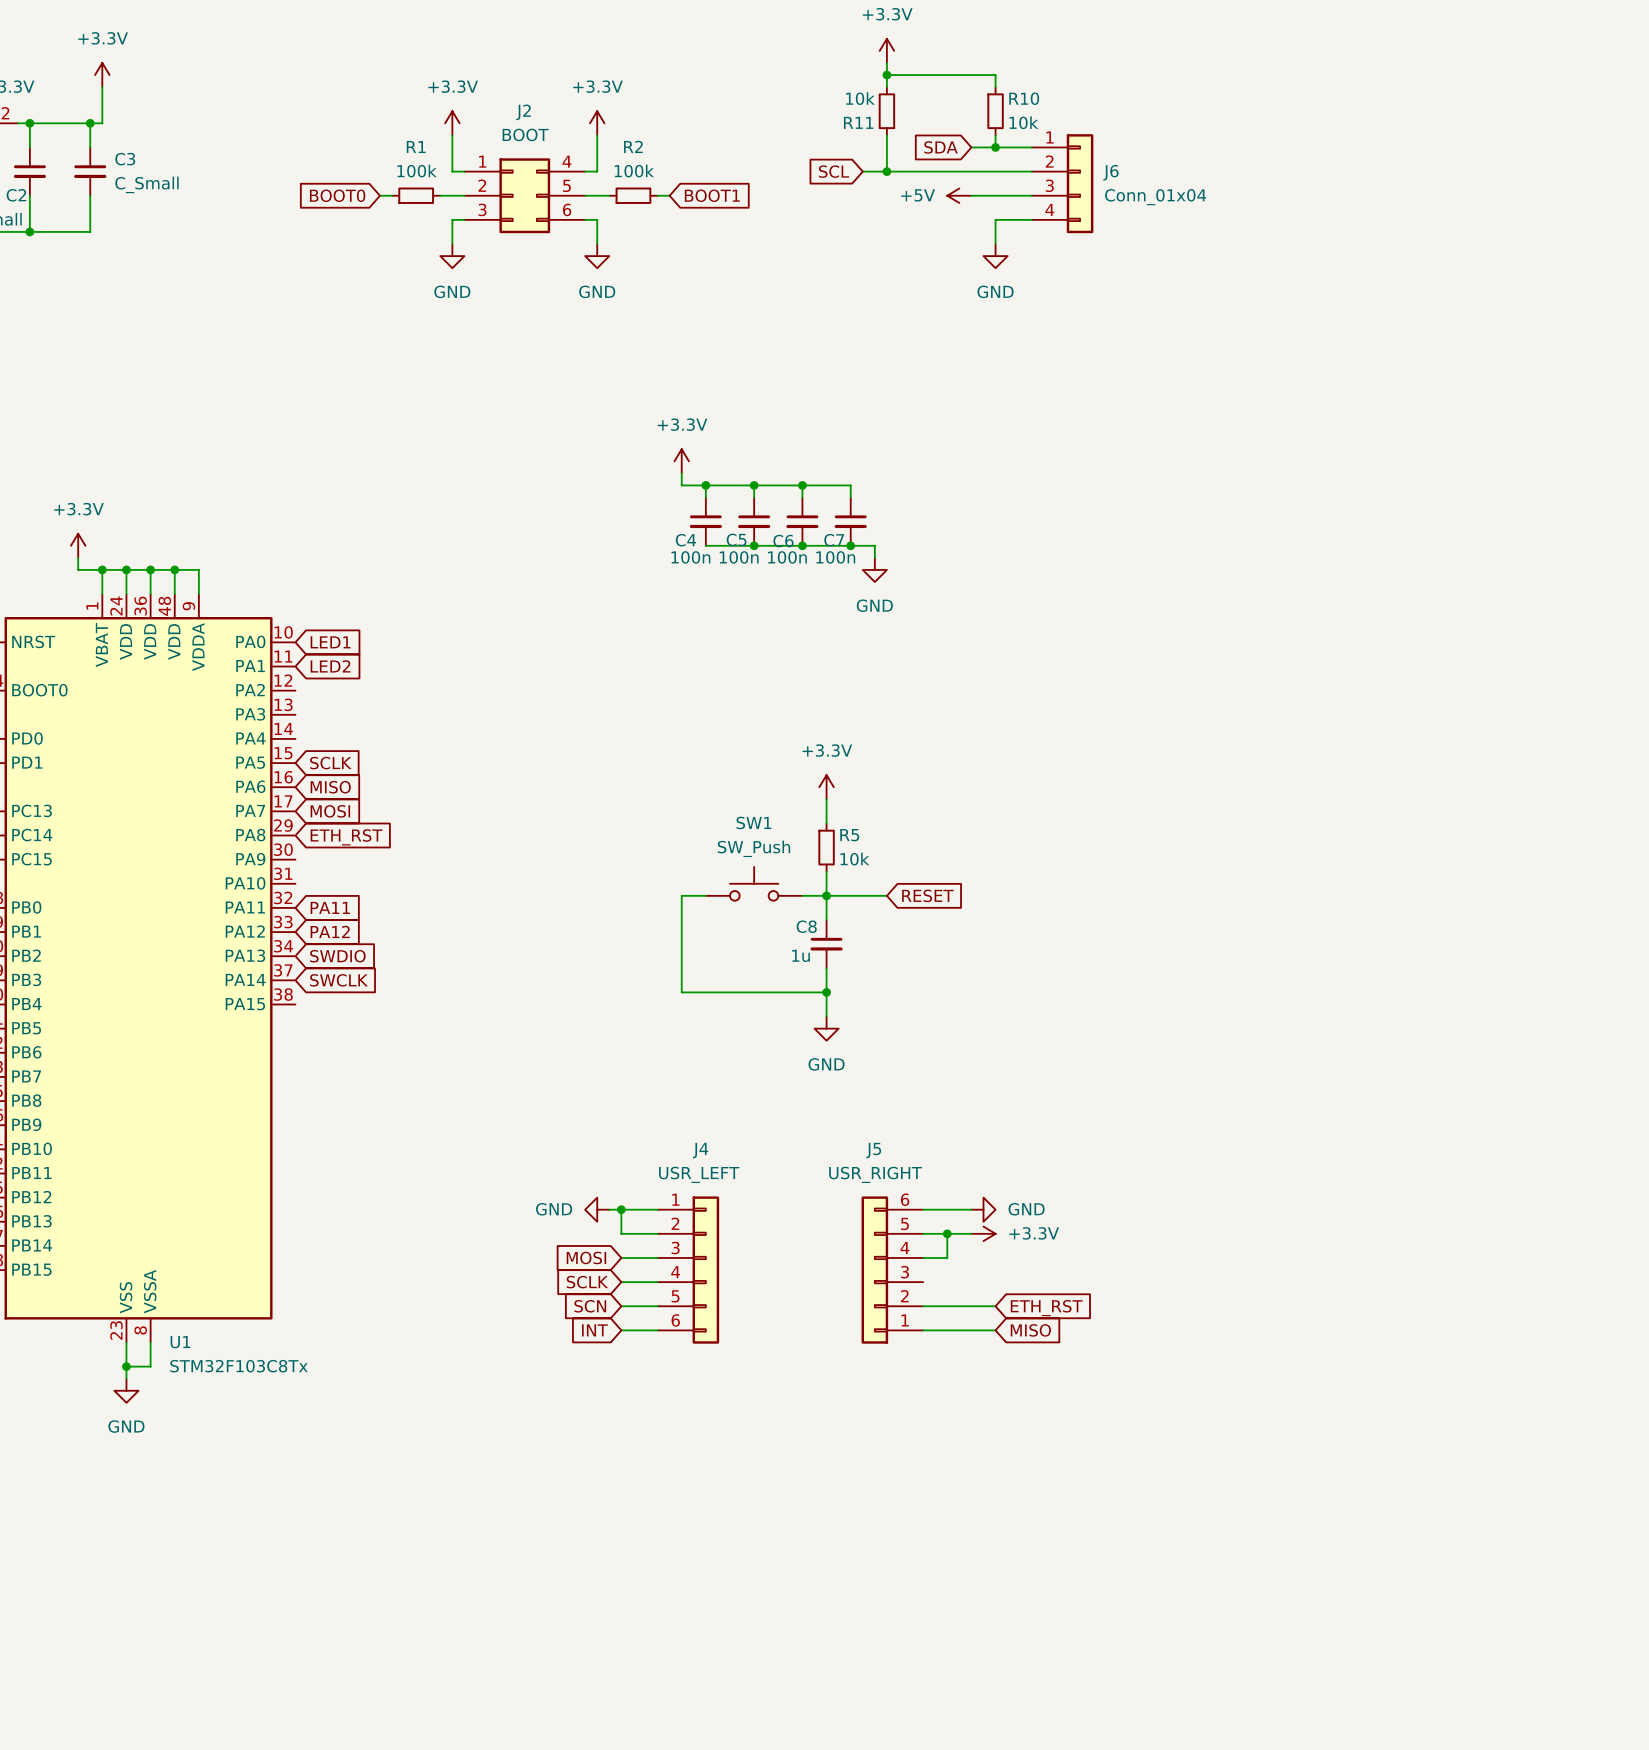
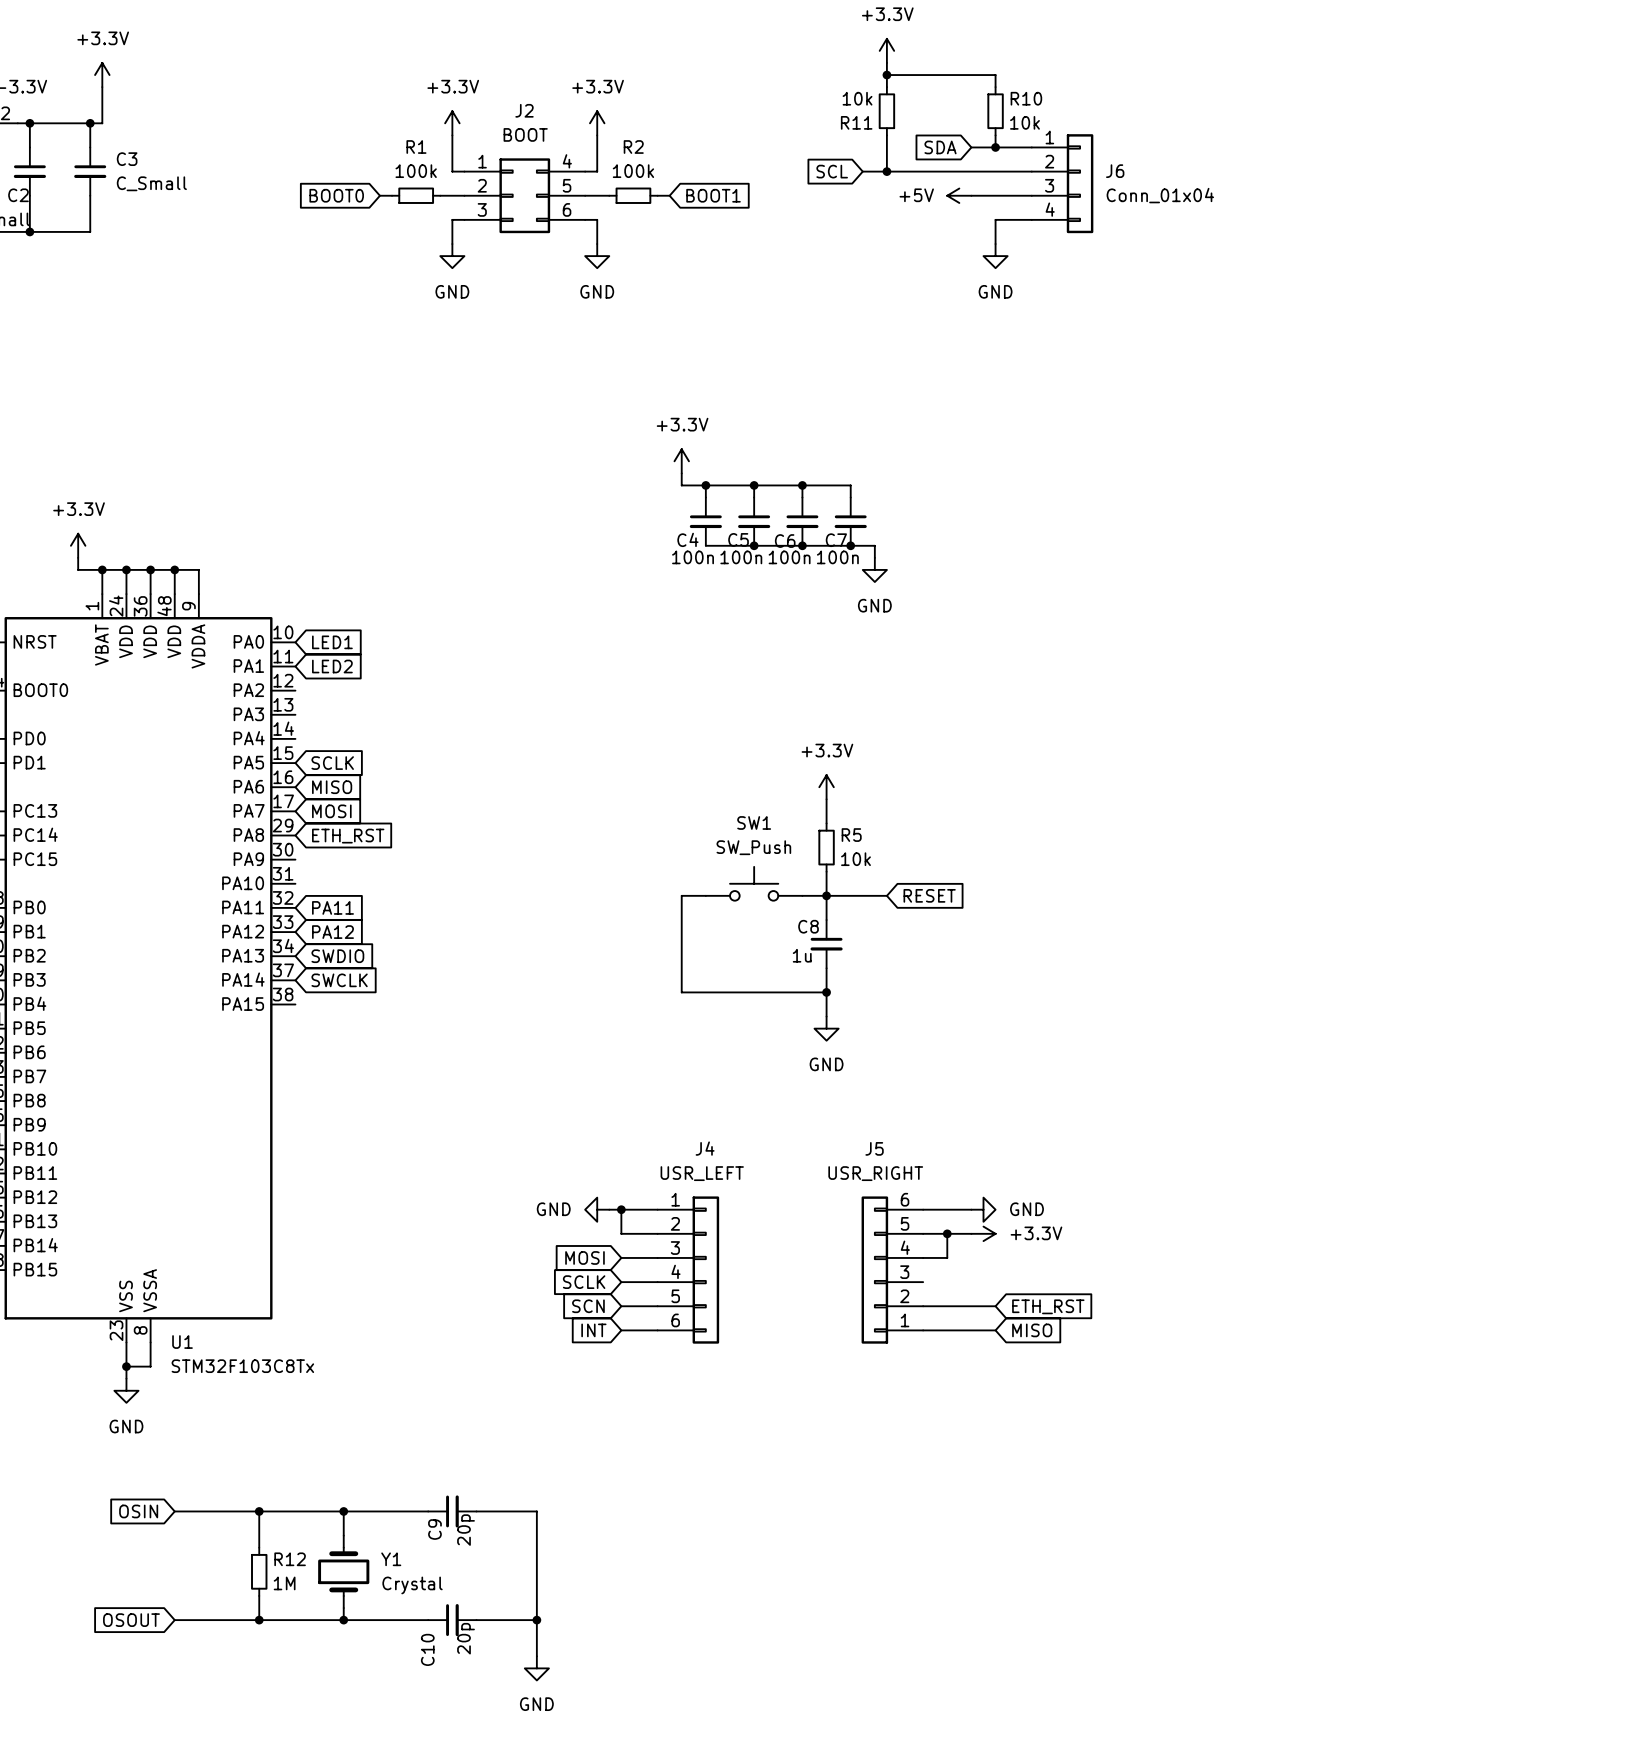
global label: none -> OSIN (138, 1511)
wire: none -> (174, 1511) (428, 1511)
wire: none -> (259, 1511) (259, 1547)
junction: none -> (259, 1511)
wire: none -> (343, 1511) (343, 1535)
junction: none -> (343, 1511)
C9: none -> 20p (452, 1511)
wire: none -> (476, 1511) (536, 1511) (536, 1656)
R12: none -> 1M (259, 1571)
Y1: none -> Crystal (343, 1571)
wire: none -> (259, 1595) (259, 1620)
wire: none -> (343, 1608) (343, 1620)
global label: none -> OSOUT (131, 1620)
wire: none -> (174, 1620) (428, 1620)
junction: none -> (259, 1620)
junction: none -> (343, 1620)
C10: none -> 20p (452, 1620)
wire: none -> (476, 1620) (536, 1620)
junction: none -> (536, 1620)
power symbol: none -> GND (536, 1668)

